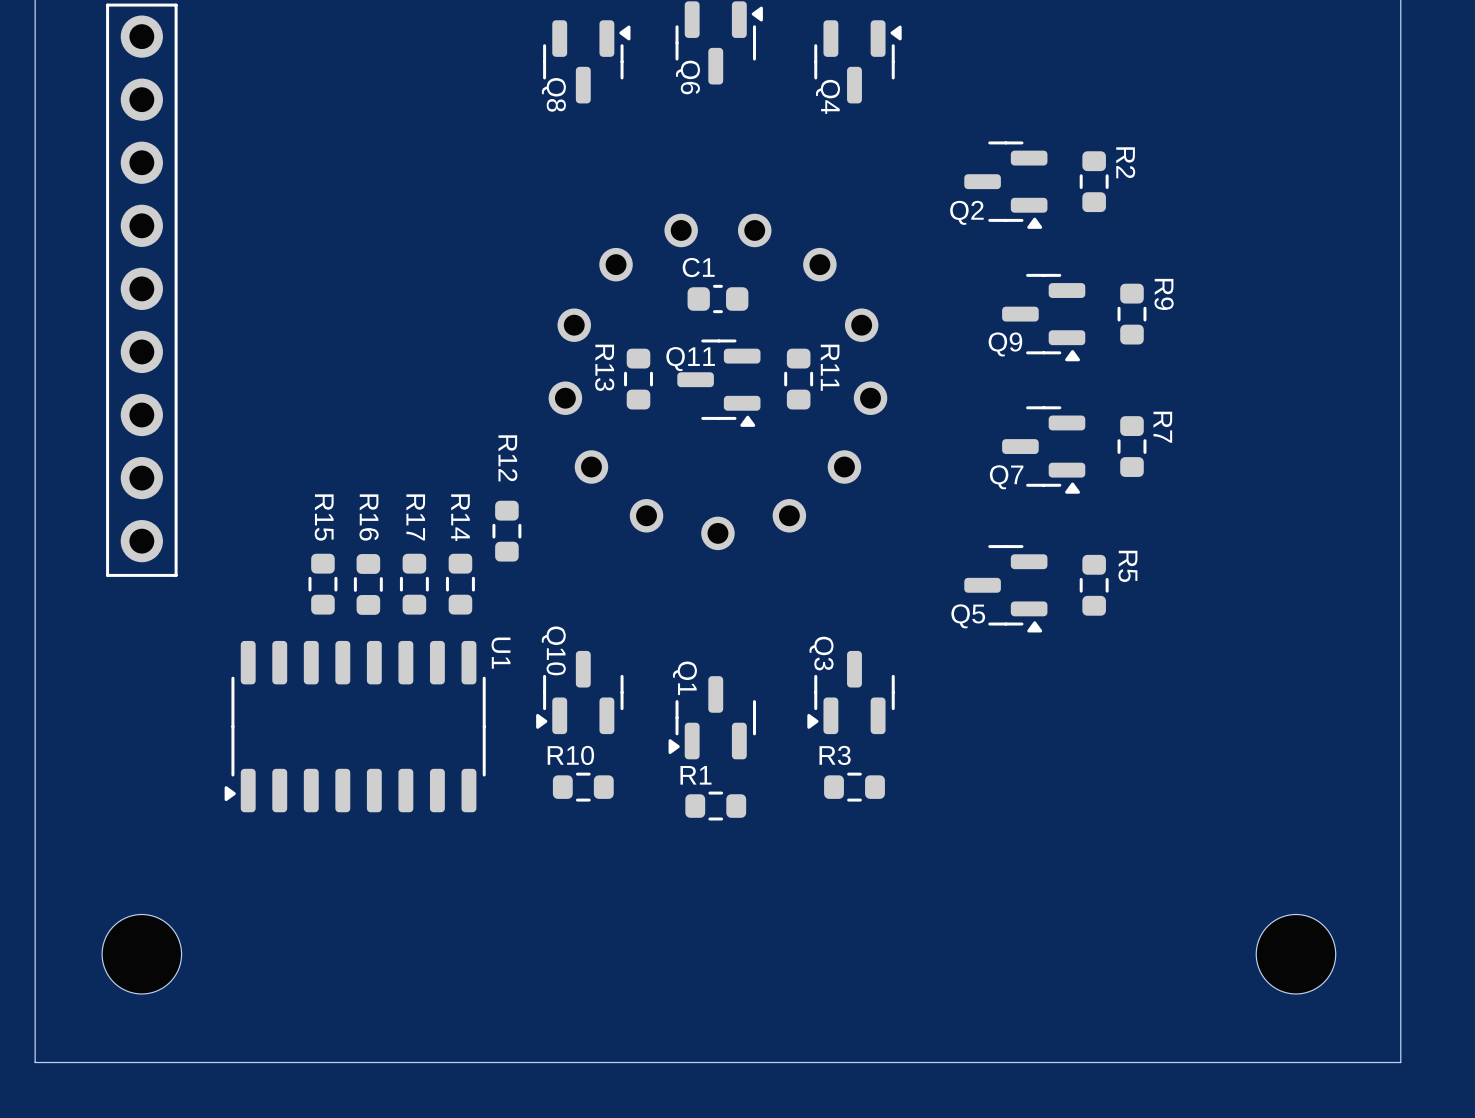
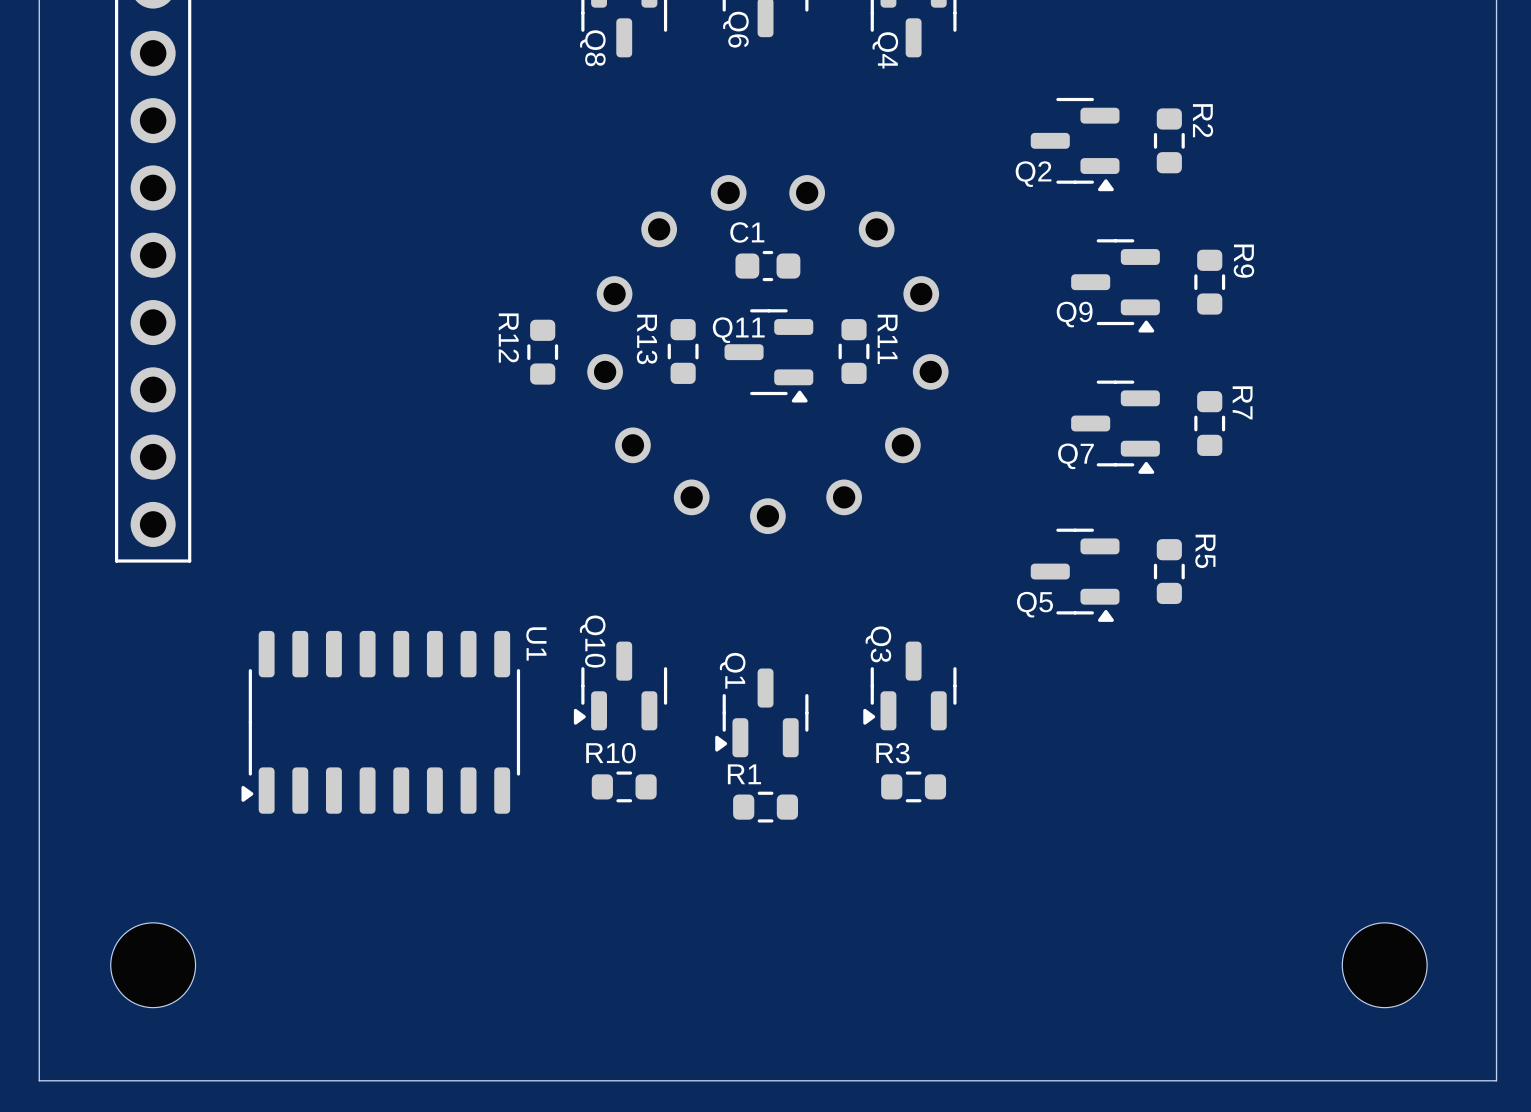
R12 name position: R12 (507, 458) -> R12 (508, 338)
R12 position: (506, 531) -> (542, 352)
R15: (322, 584) -> none
R16: (368, 584) -> none
R17: (414, 584) -> none
R14: (460, 584) -> none

